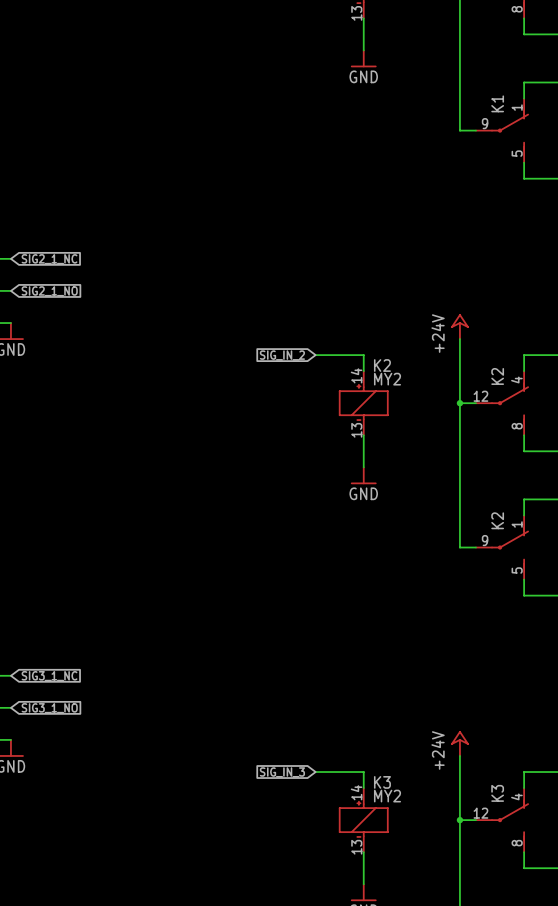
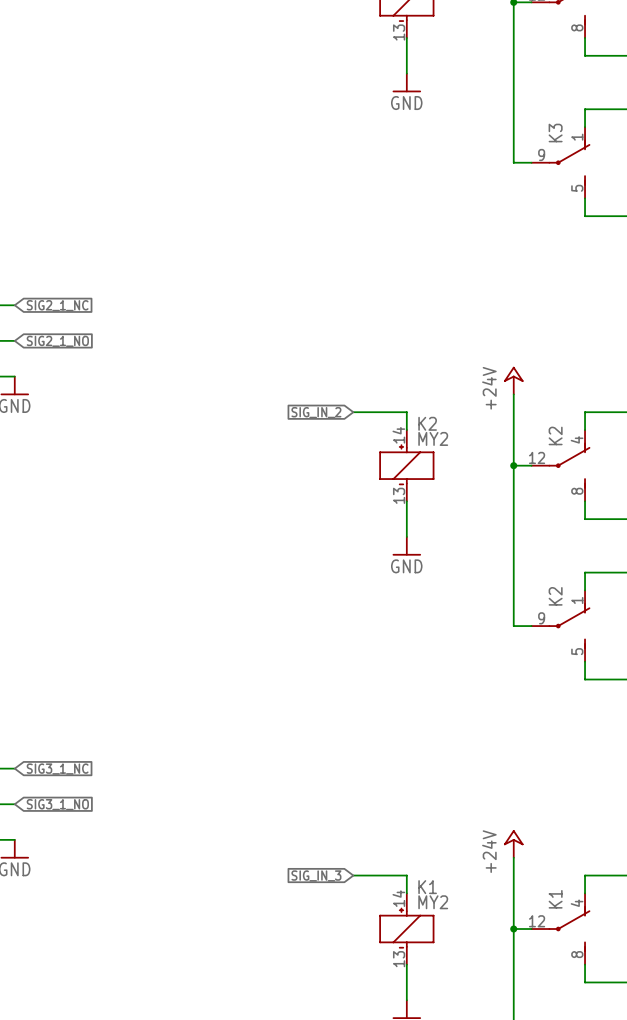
K1 name: K1 (497, 103) -> K3 (555, 133)
K3 name: K3 (382, 782) -> K1 (427, 887)
K3 name: K3 (497, 793) -> K1 (555, 899)

